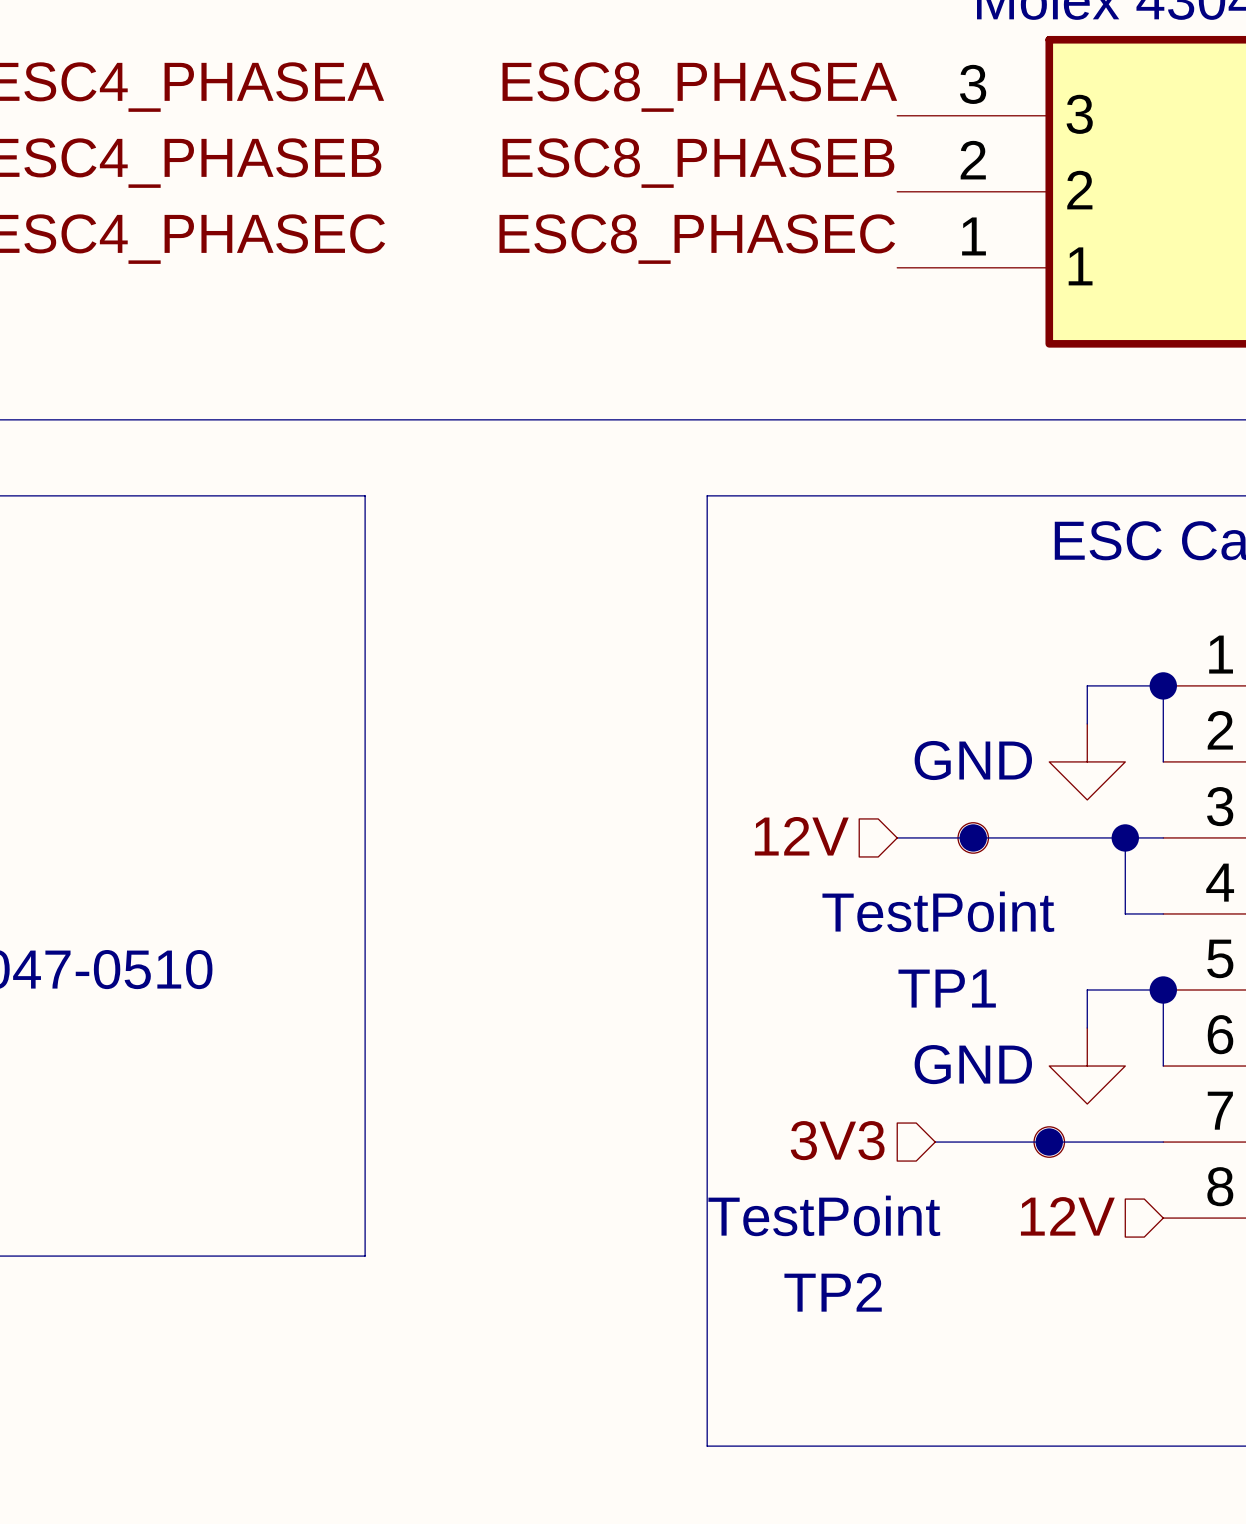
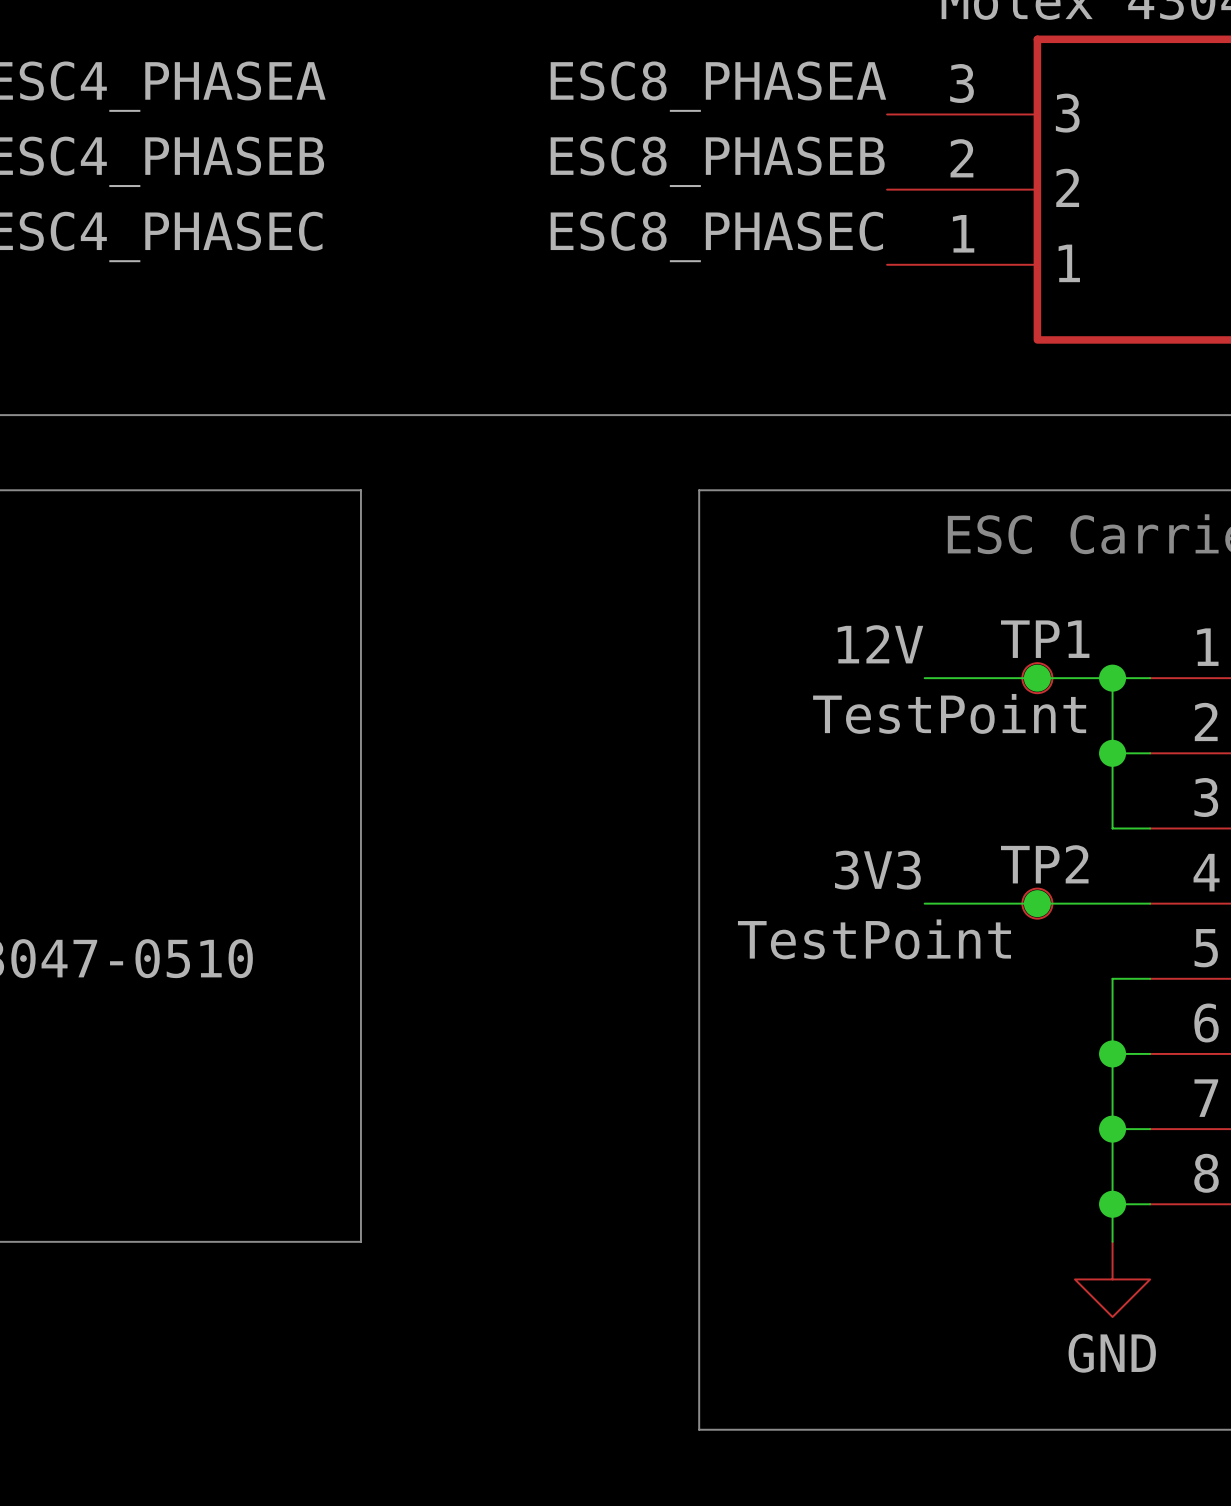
label: none -> 12V (880, 644)
junction: none -> (1037, 678)
wire: (1087, 685) (1087, 723) -> (1074, 678) (924, 678)
wire: none -> (1112, 678) (1112, 828)
wire: (1163, 685) (1163, 761) -> (1112, 753) (1150, 753)
junction position: (1163, 685) -> (1112, 678)
power symbol: GND (1087, 761) -> none
junction: none -> (1112, 753)
hierarchical label: 12V (801, 836) -> none
wire: (897, 837) (1125, 837) (1125, 913) -> (924, 903) (1112, 903)
junction: (973, 837) -> none
TP1 position: (973, 837) -> (1037, 678)
junction: (1125, 837) -> none
label: none -> 3V3 (877, 870)
TP1 value position: TestPoint (938, 911) -> TestPoint (949, 713)
junction: none -> (1037, 903)
TP1 name position: TP1 (947, 988) -> TP1 (1045, 639)
wire: (1125, 990) (1087, 990) (1087, 1028) -> (1112, 978) (1112, 1241)
wire: (1163, 990) (1163, 1066) -> (1112, 1053) (1150, 1053)
junction: (1163, 990) -> none
power symbol text position: GND (973, 1064) -> GND (1112, 1353)
power symbol position: GND (1087, 1066) -> GND (1112, 1279)
junction: none -> (1112, 1053)
hierarchical label: 3V3 (837, 1140) -> none
wire: (935, 1142) (1125, 1142) -> none
junction: (1049, 1142) -> none
TP2 position: (1049, 1142) -> (1037, 903)
junction: none -> (1112, 1129)
TP2 value position: TestPoint (824, 1215) -> TestPoint (874, 939)
hierarchical label: 12V (1067, 1216) -> none
wire: none -> (1112, 1204) (1150, 1204)
junction: none -> (1112, 1204)
TP2 name position: TP2 (833, 1292) -> TP2 (1044, 864)

